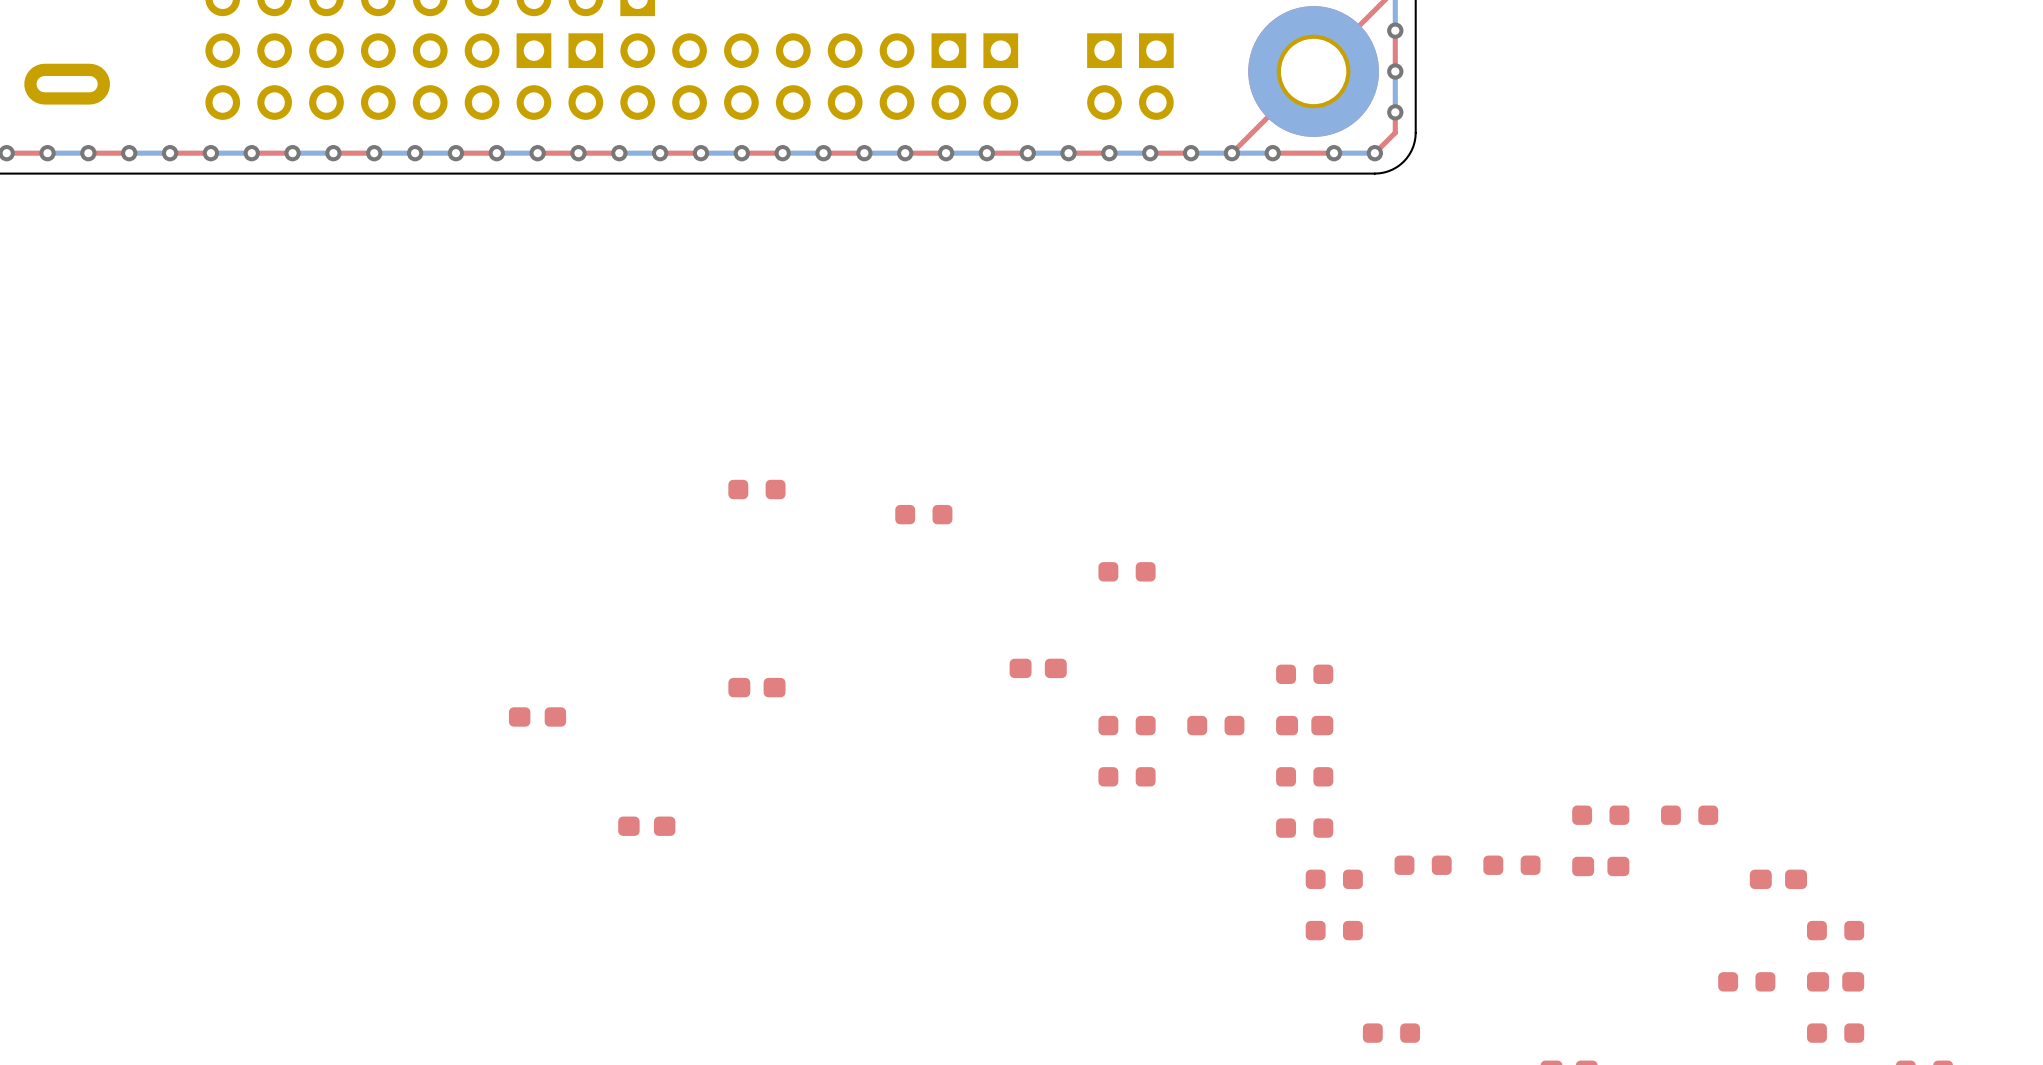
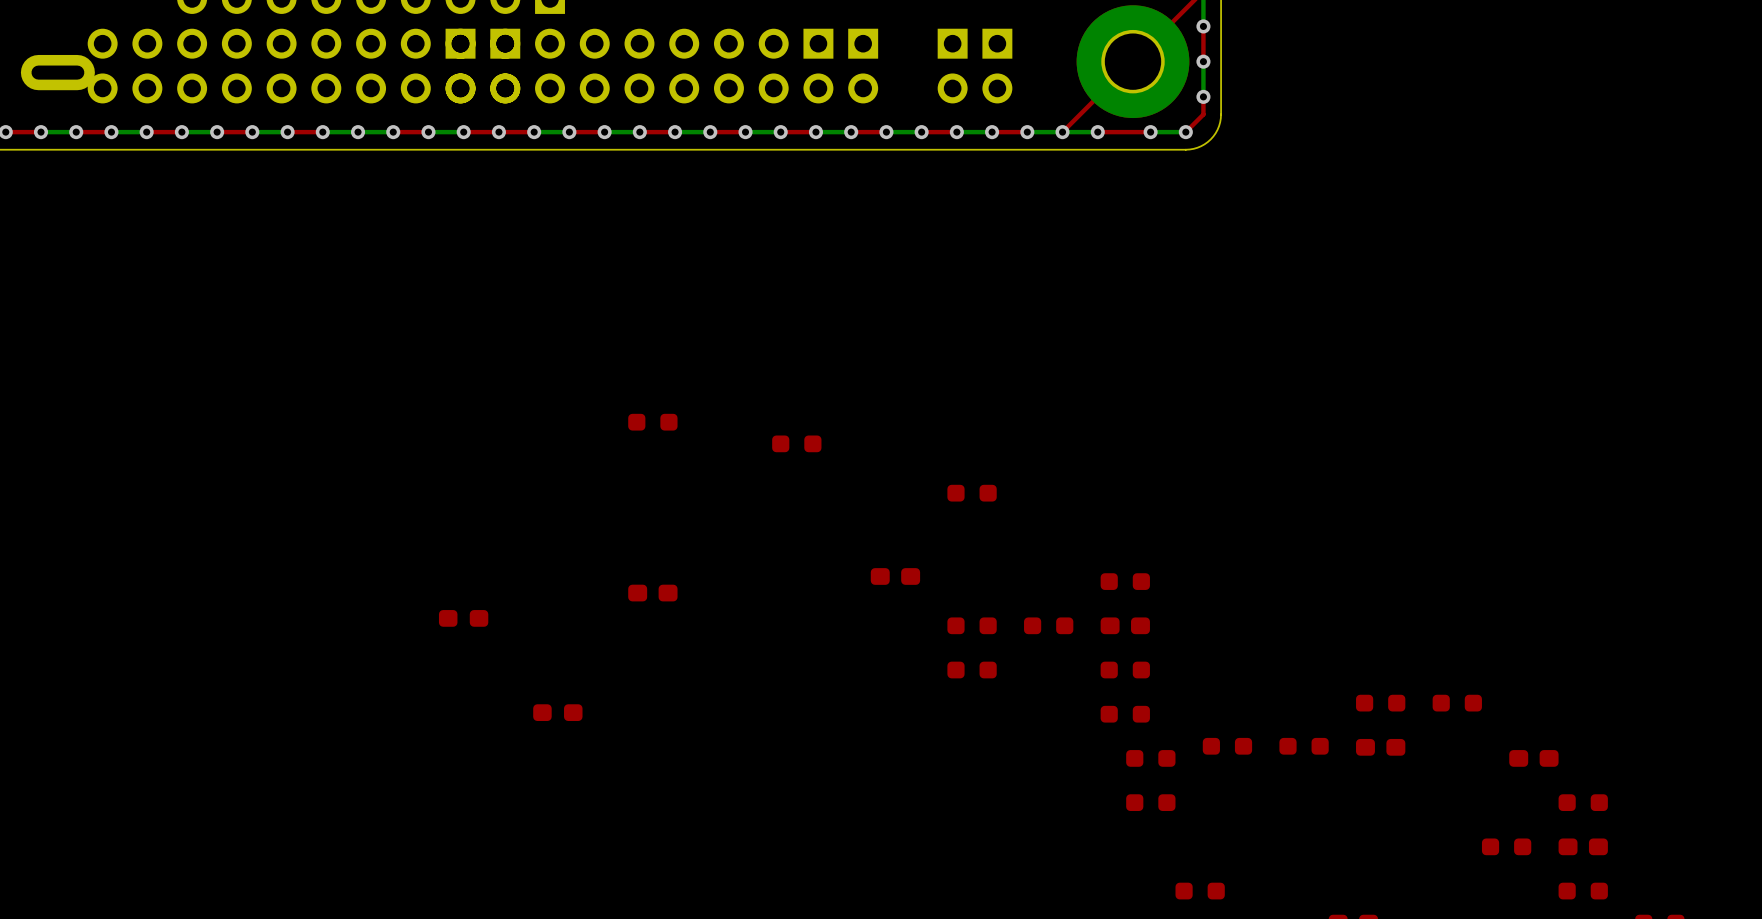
part: none -> (281, 66)
part: (378, 76) -> none
part: none -> (639, 66)

